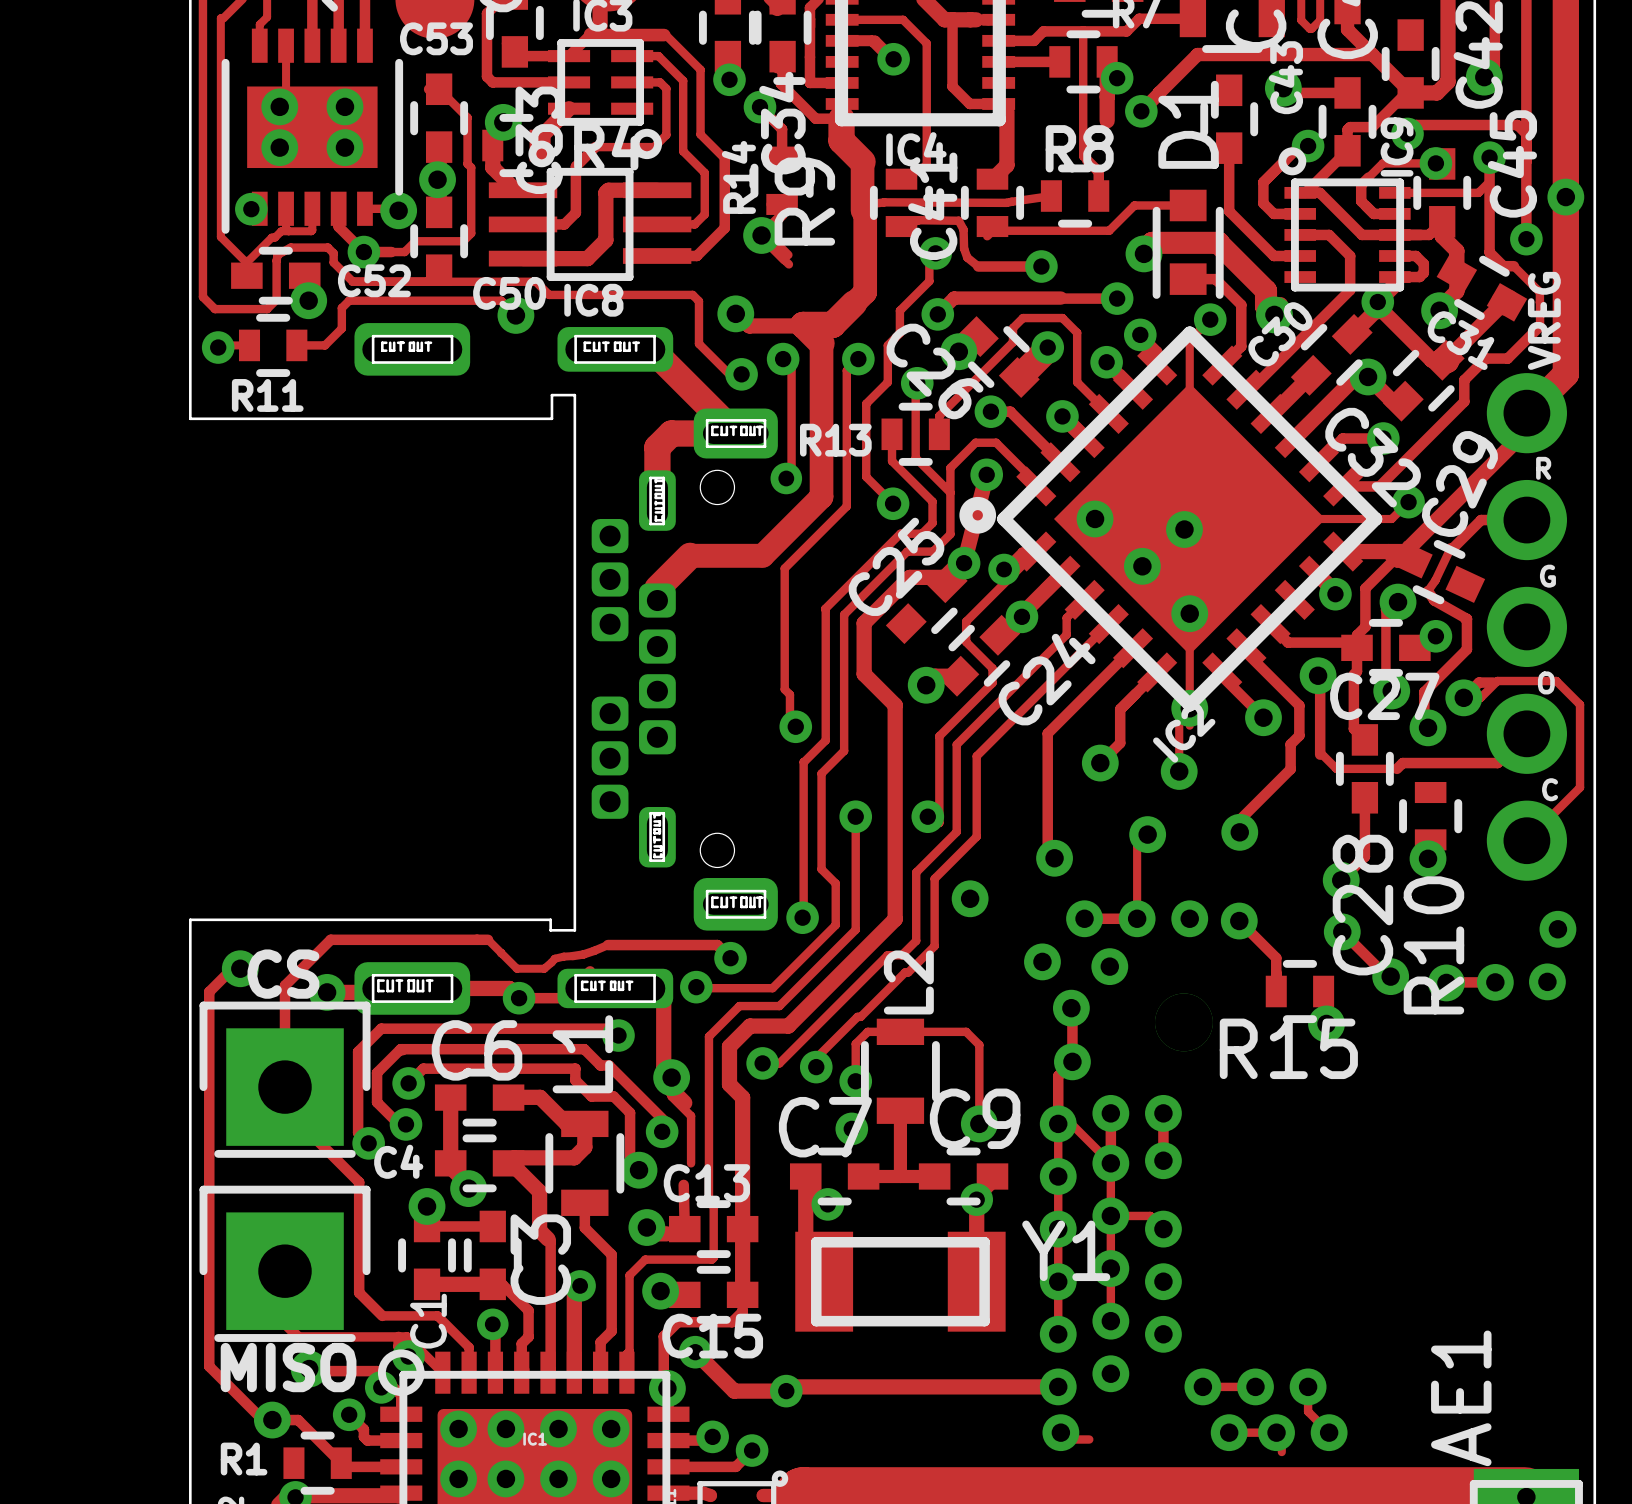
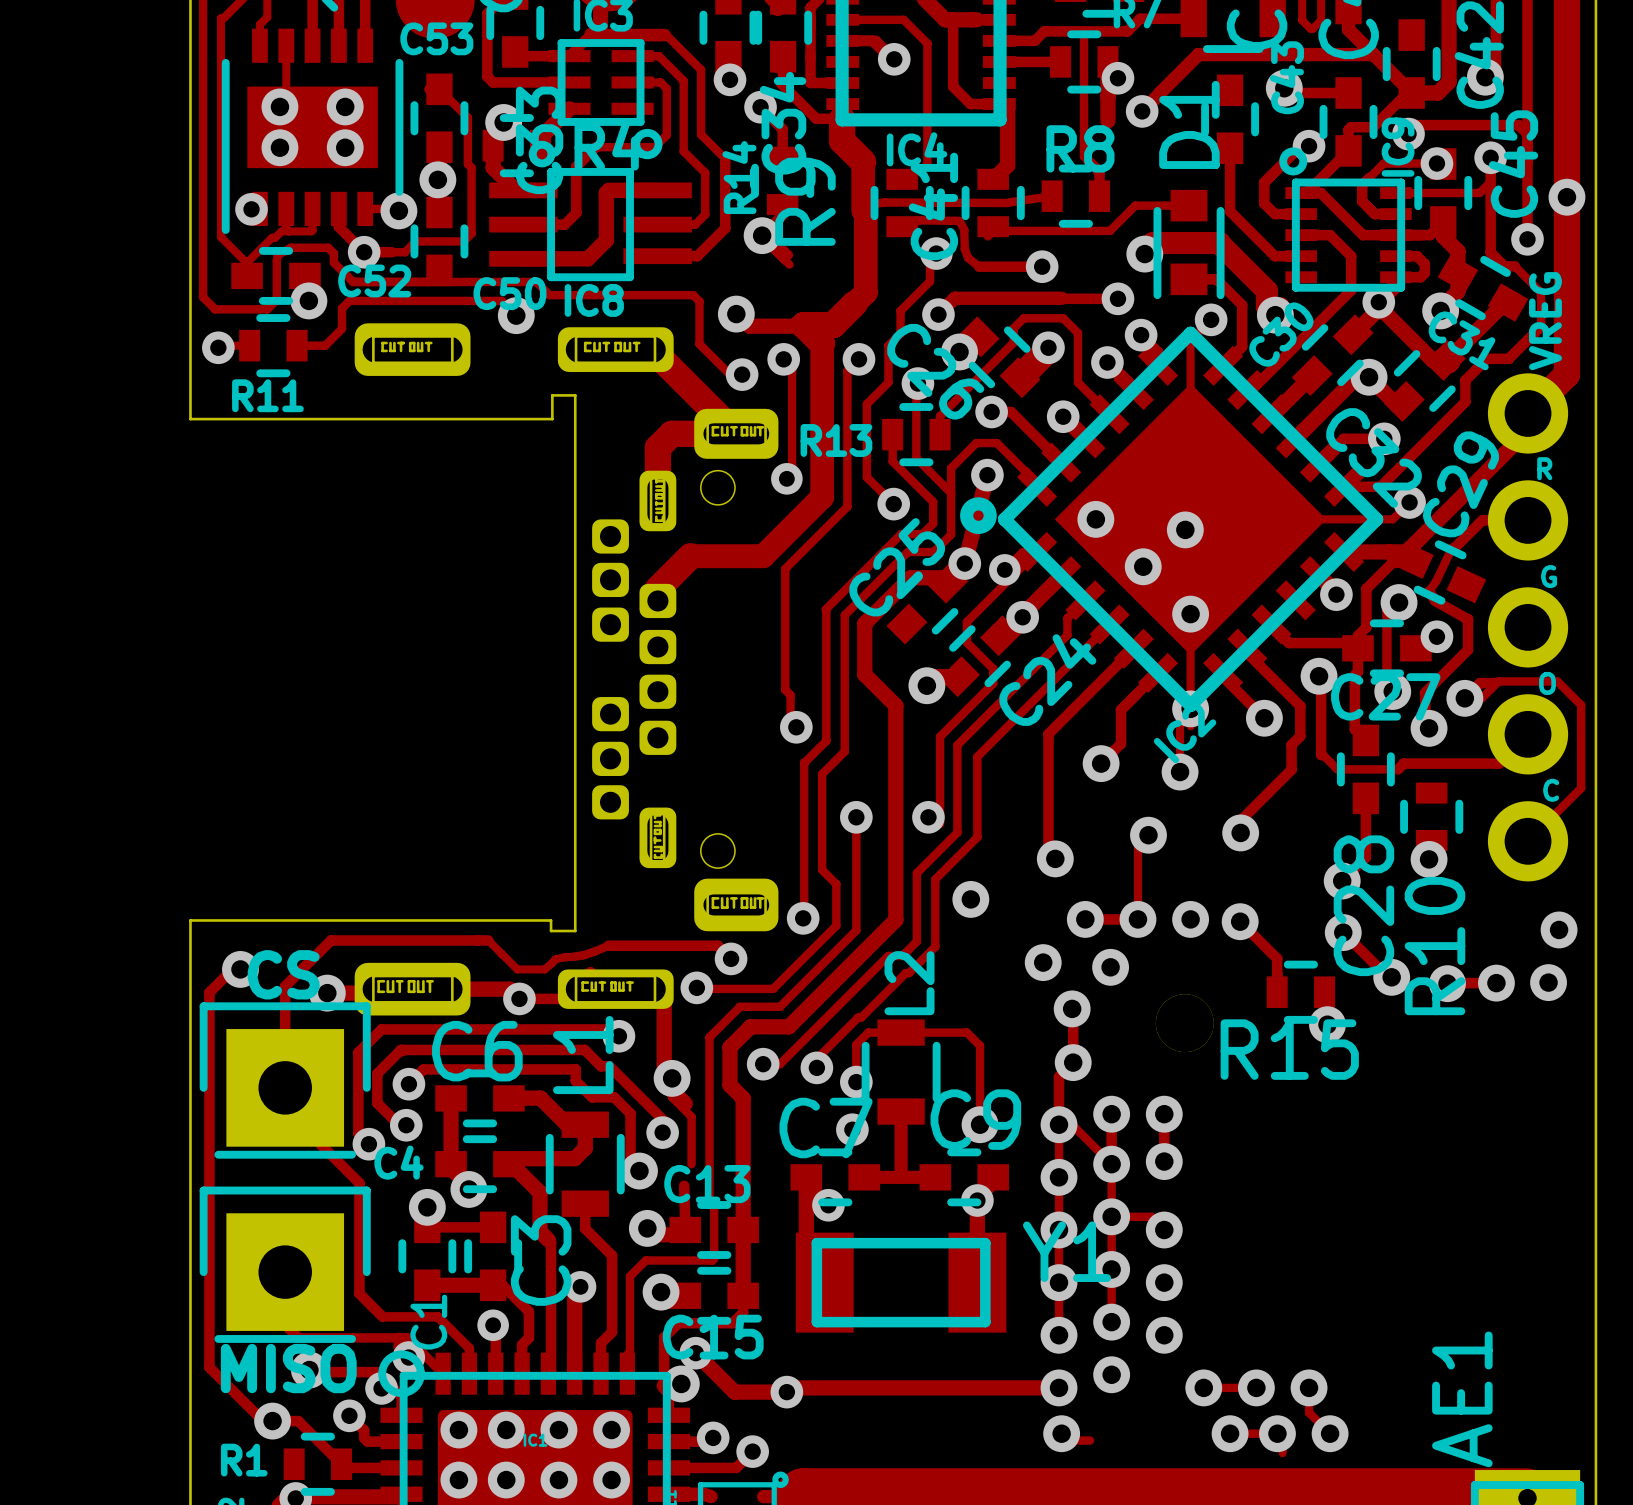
via position: (667, 1388) -> (681, 1383)

